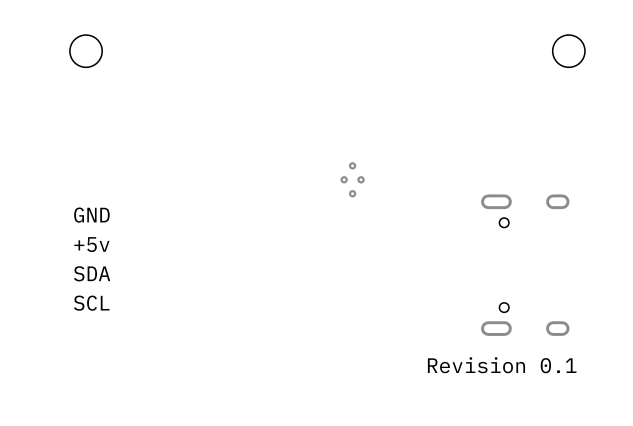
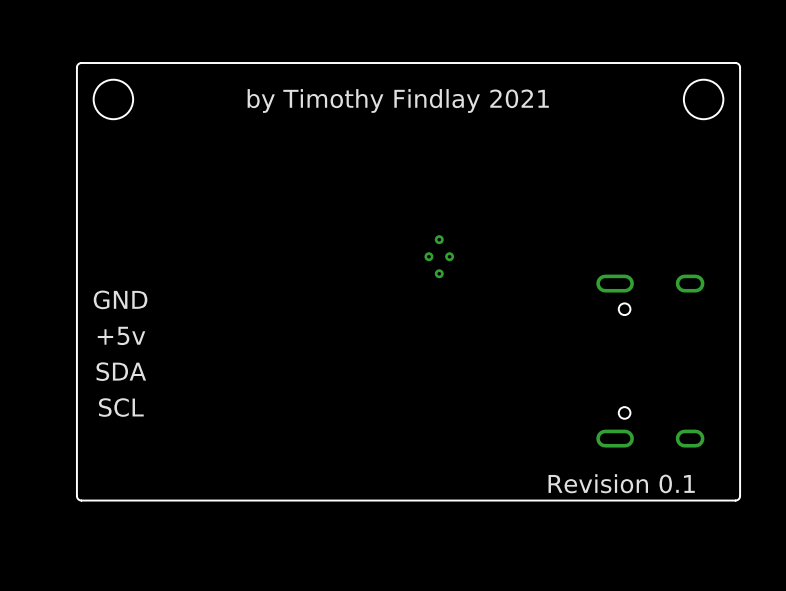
board edge: none -> (735, 63) (79, 63) (76, 67) (77, 498) (81, 500) (737, 499) (740, 495) (740, 67) (735, 63)
text: none -> by Timothy Findlay 2021 (398, 100)

